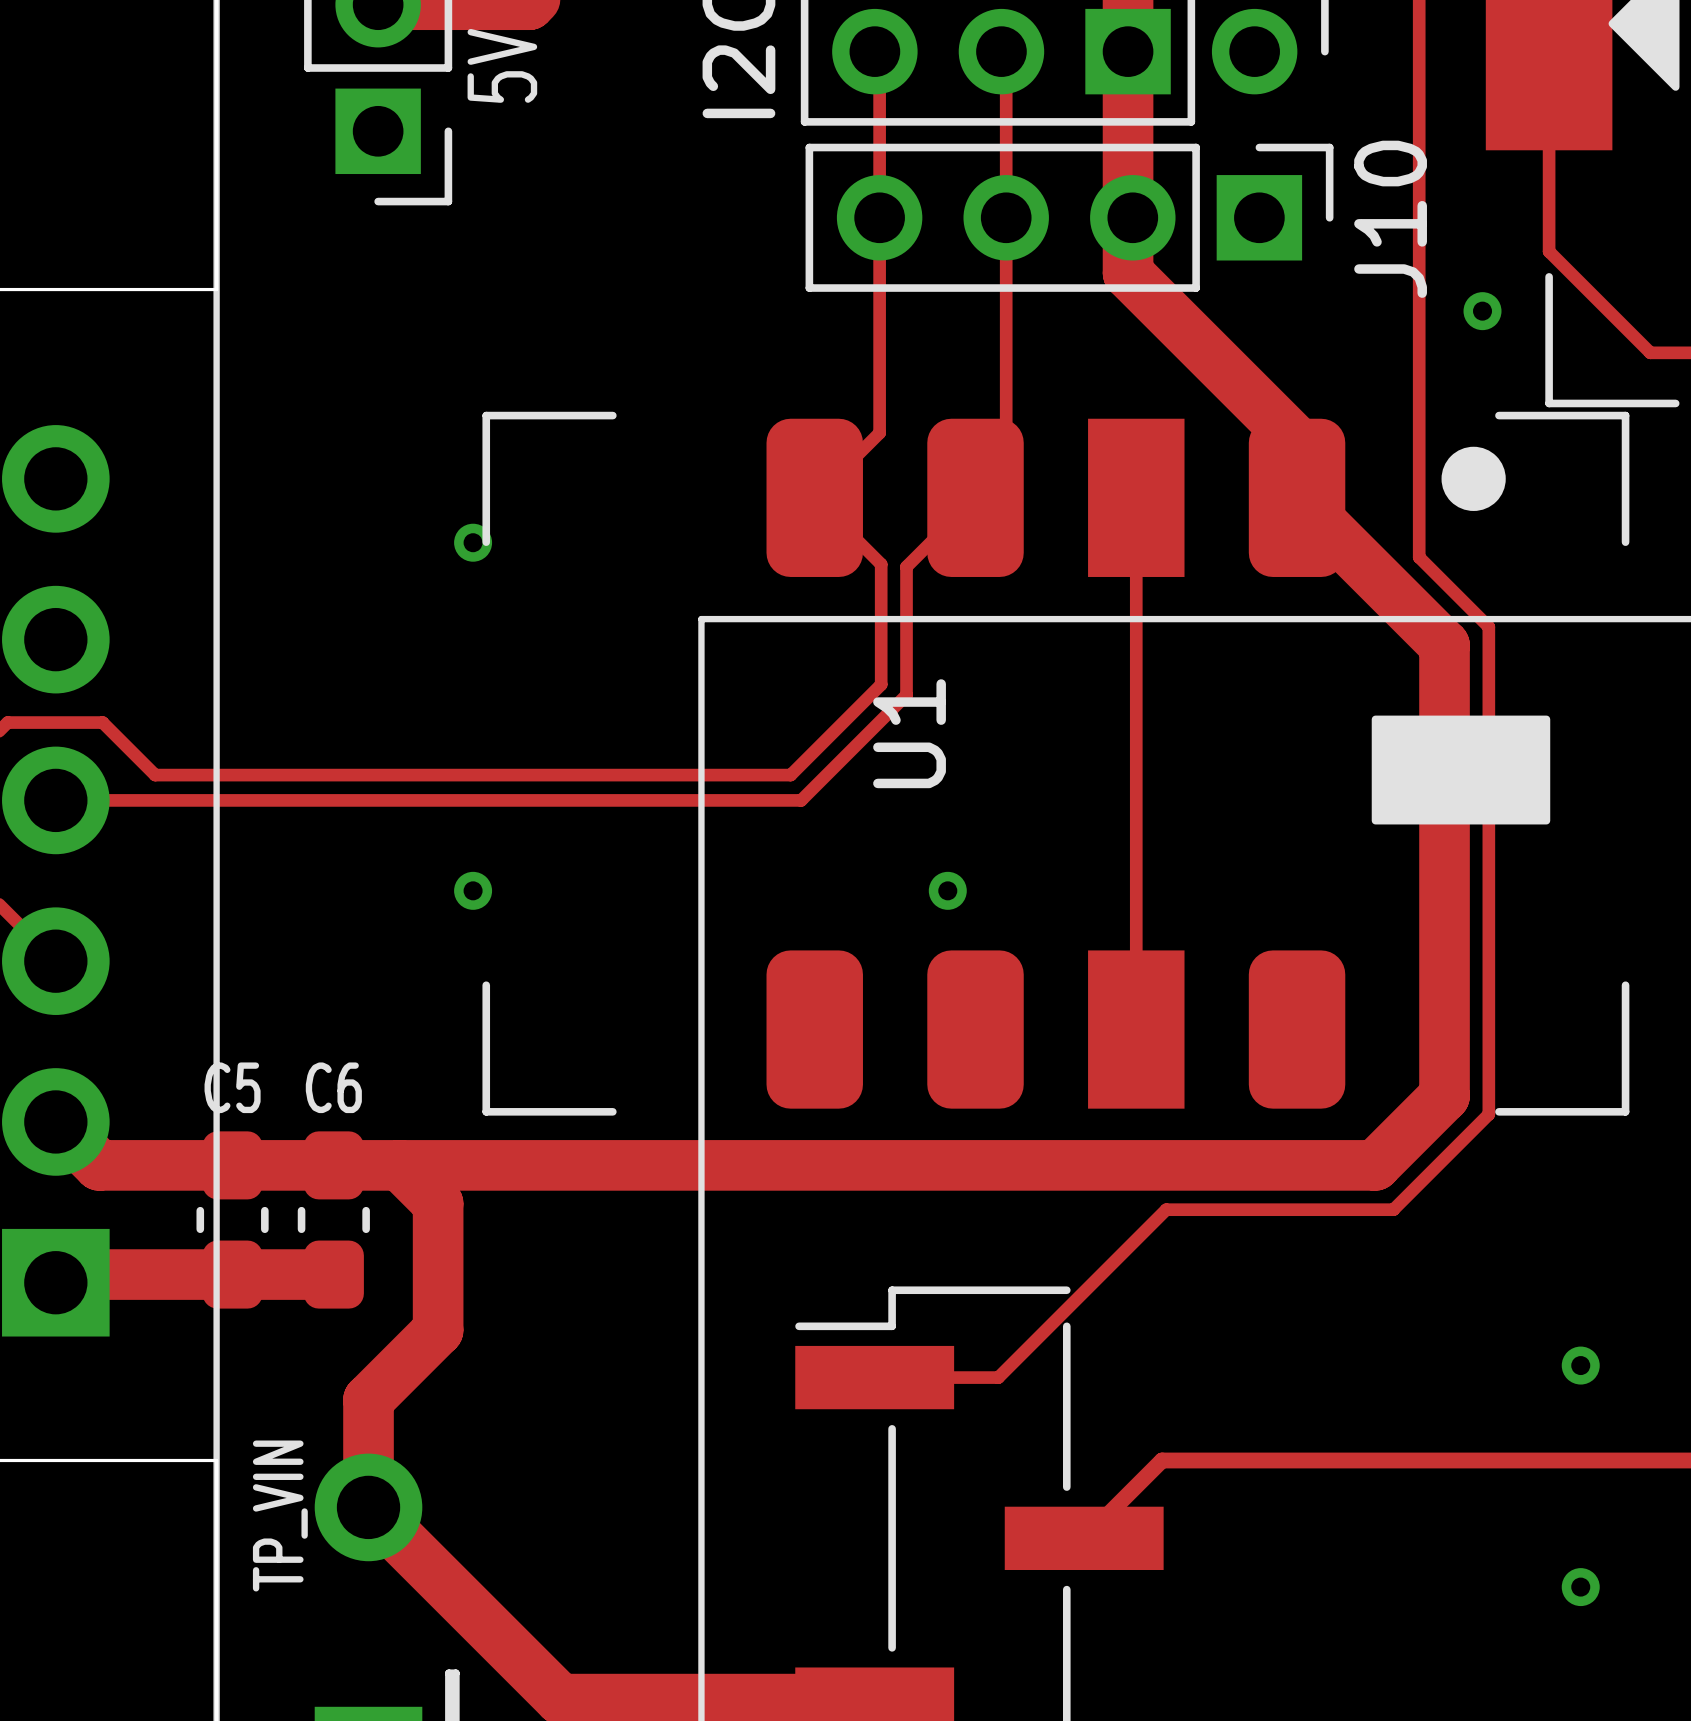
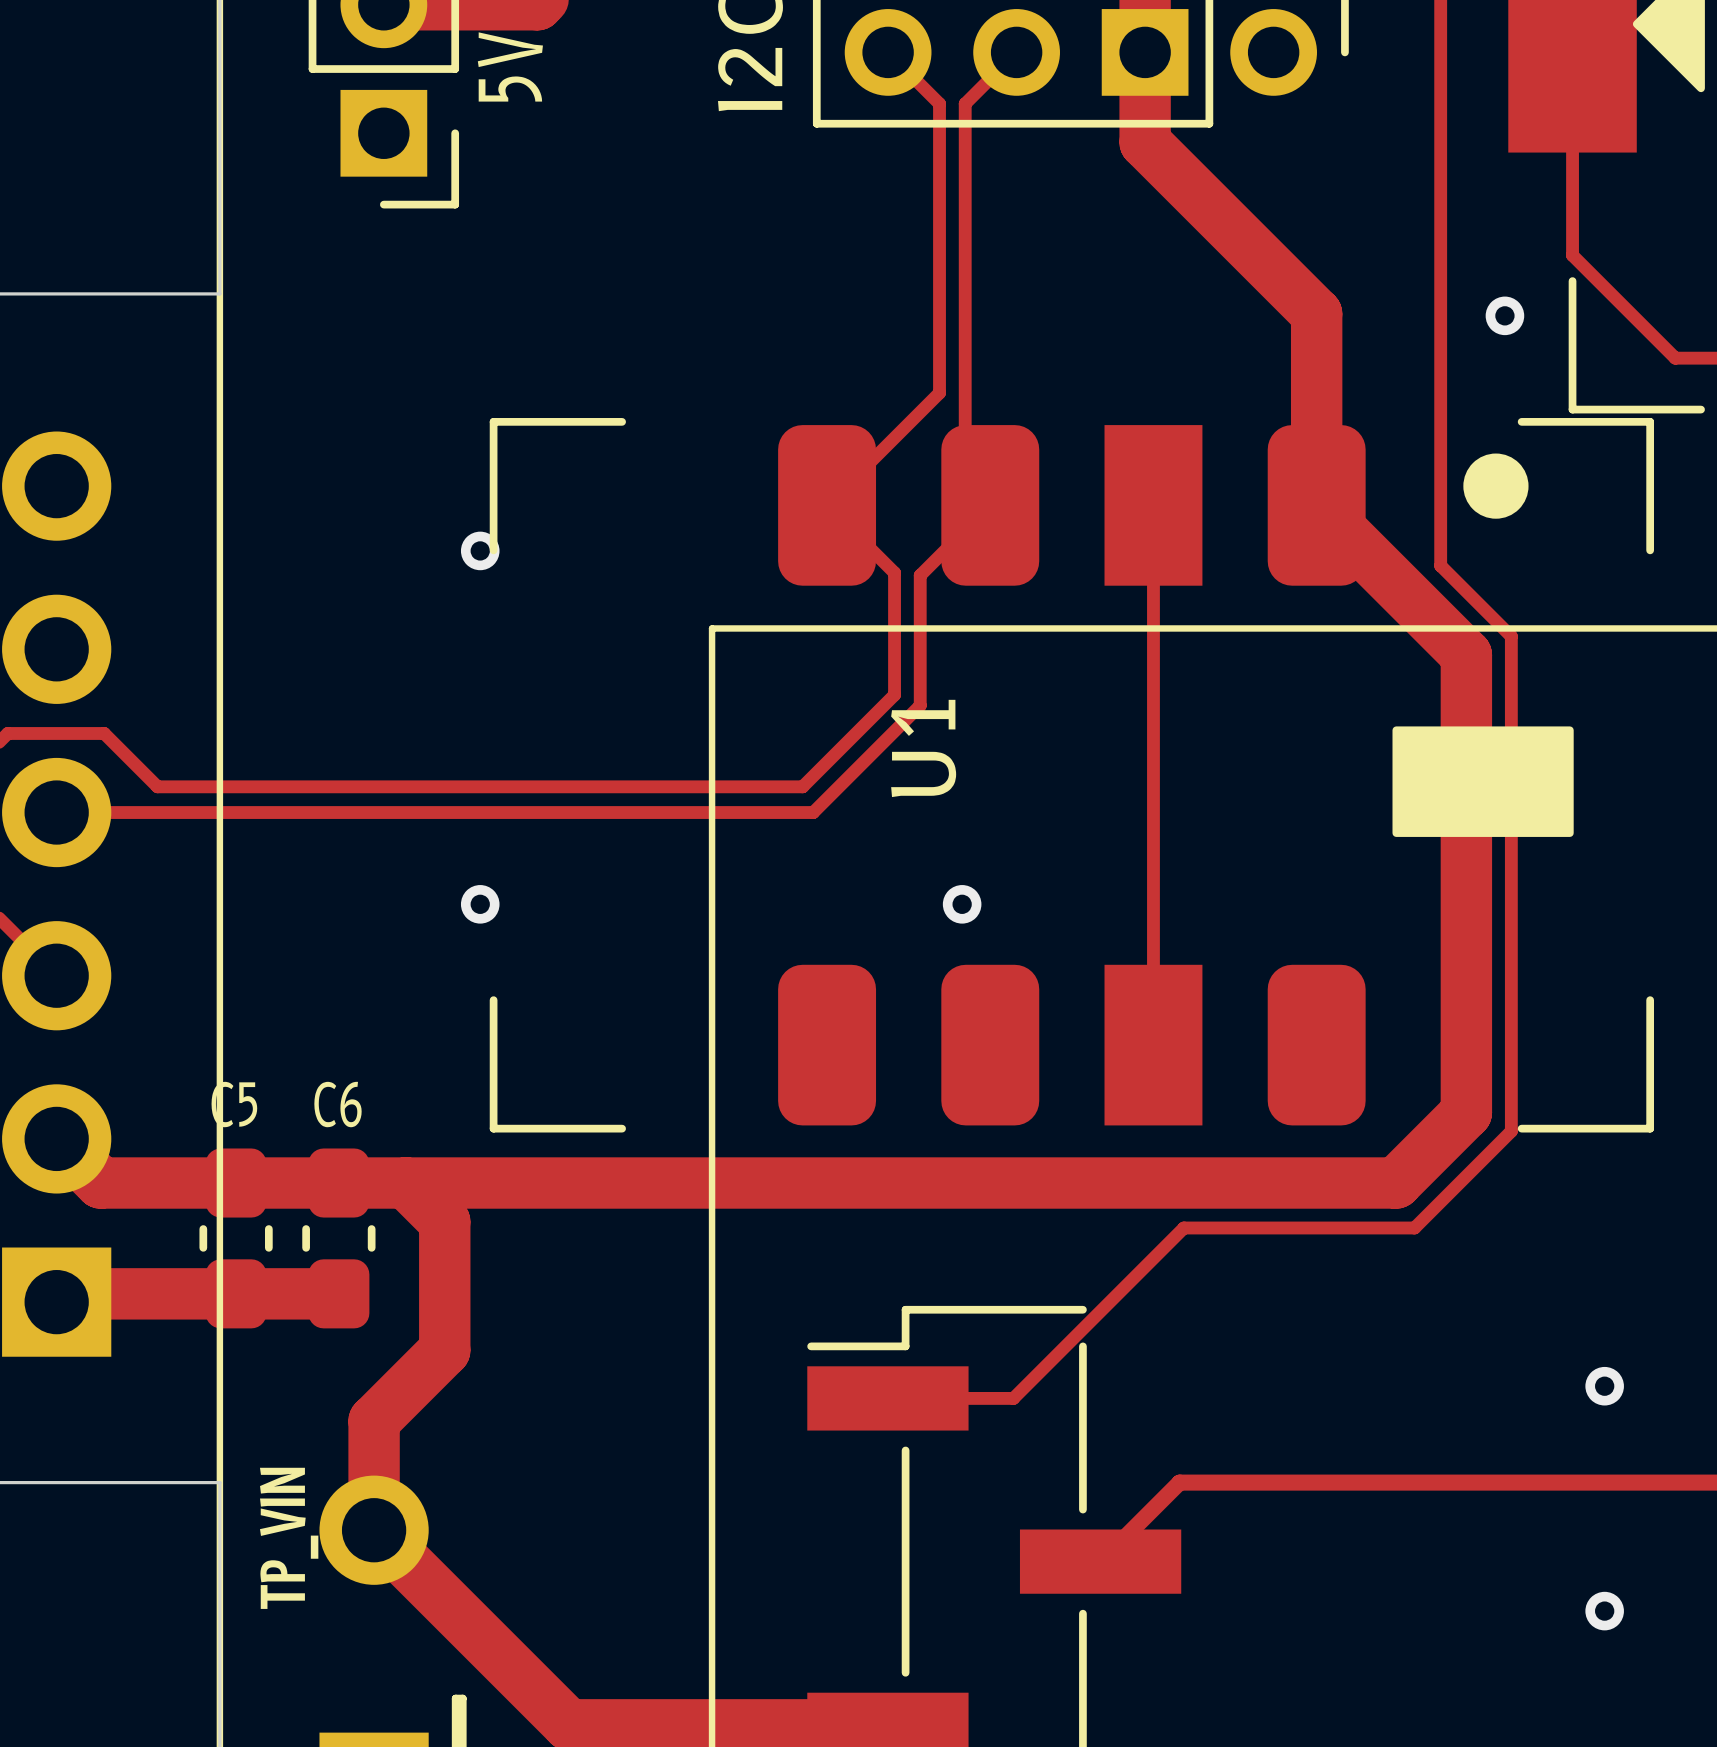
track: (1001, 51) (1006, 56) (1006, 467) (975, 497) -> (1016, 52) (965, 103) (965, 480) (990, 505)
track: (879, 56) (879, 432) -> (892, 57) (939, 103) (939, 392) (892, 439)
track: (1128, 140) (1128, 273) (1297, 442) -> (1145, 142) (1316, 313) (1316, 448)
J10: (1069, 217) -> none

